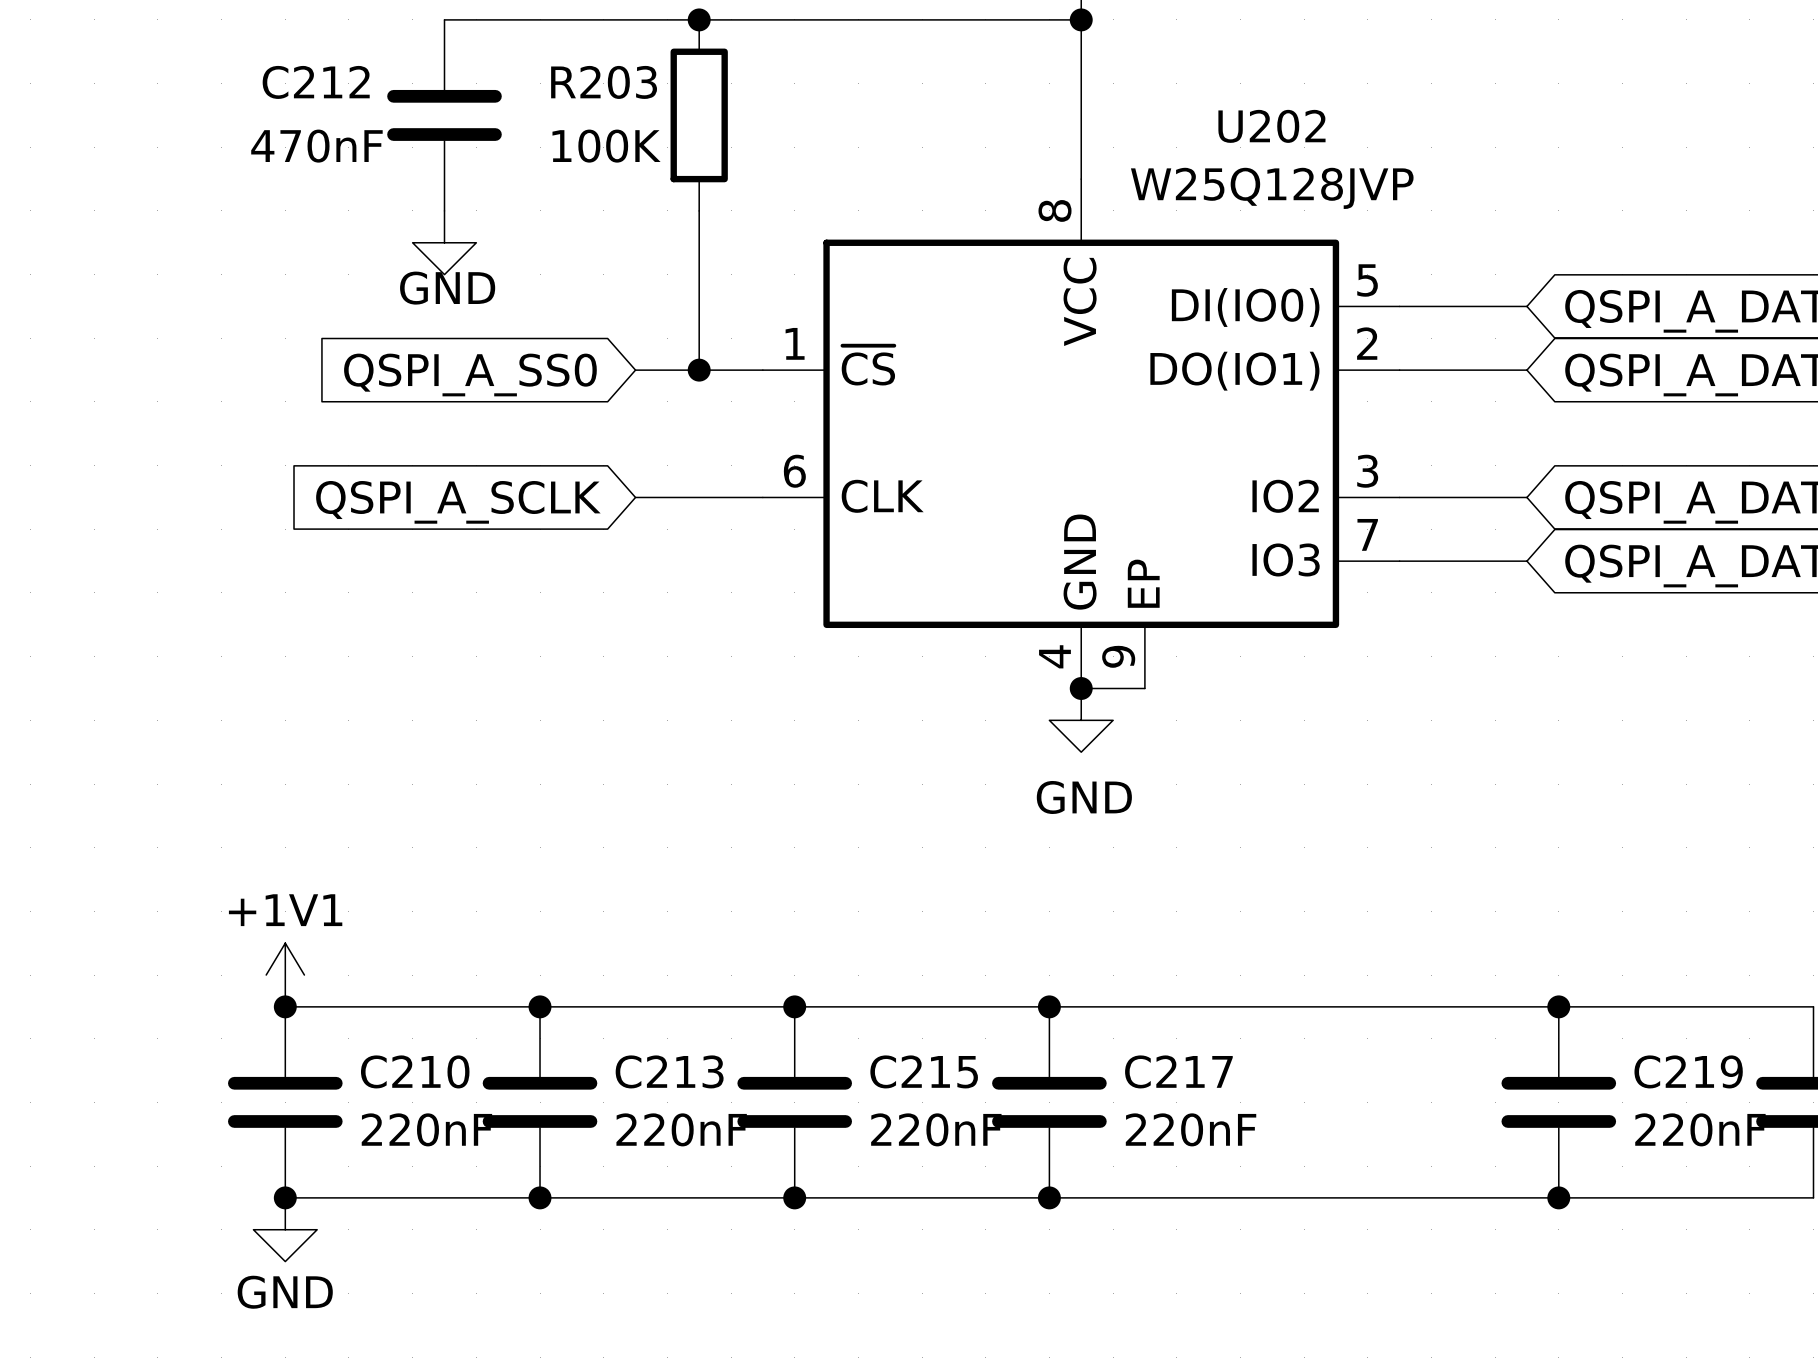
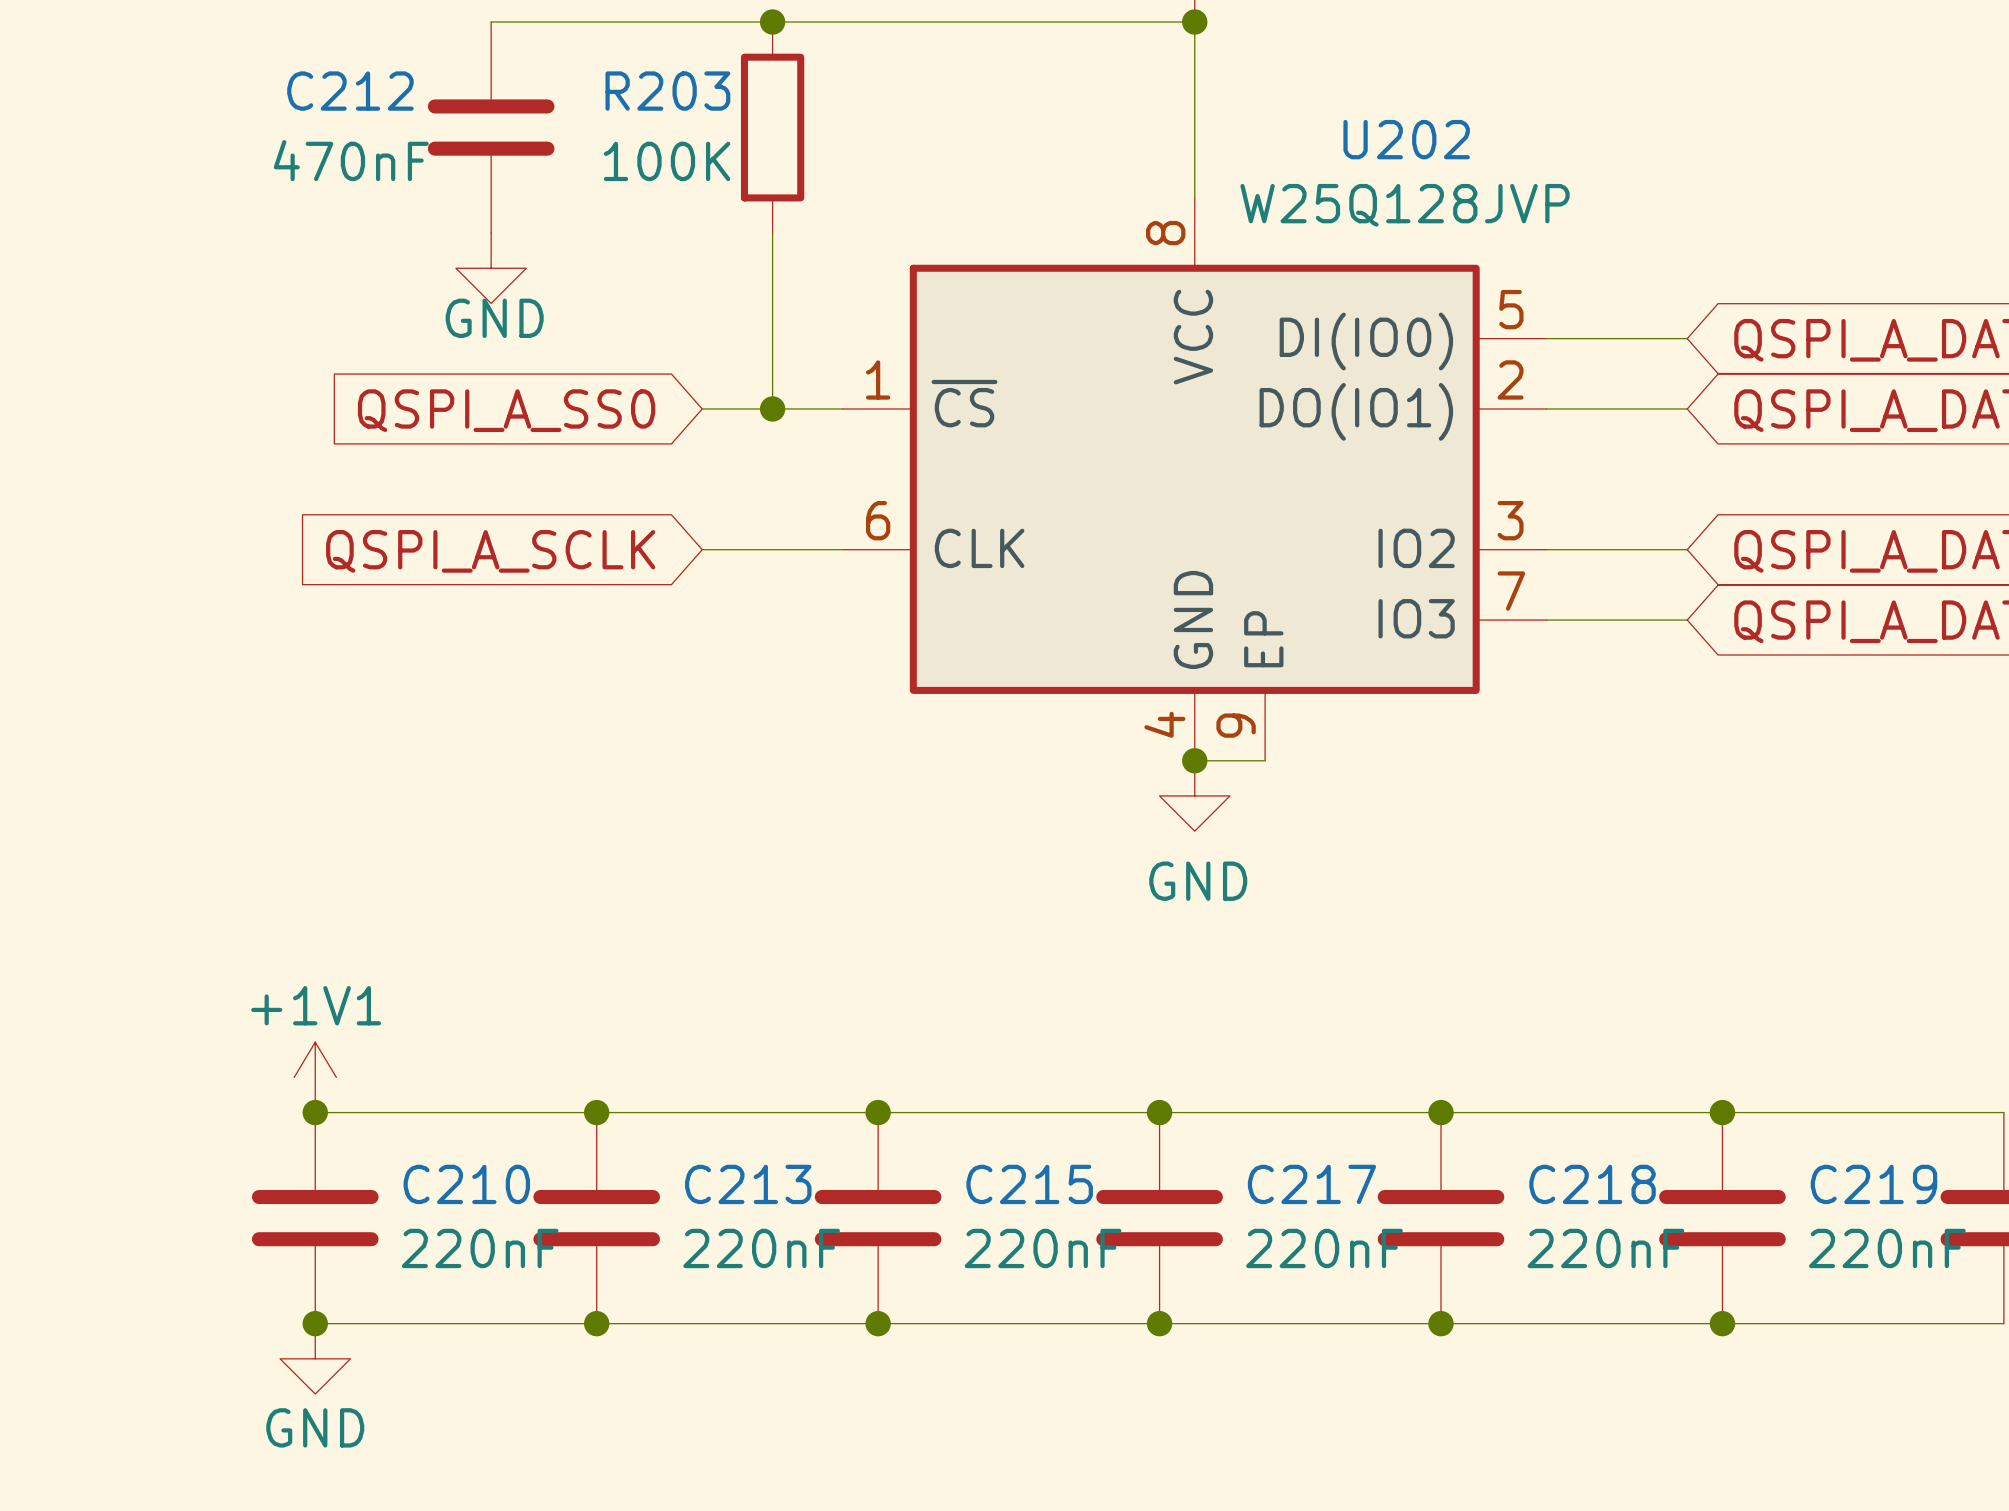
junction: none -> (1441, 1112)
C218: none -> 220nF (1441, 1218)
junction: none -> (1441, 1323)

